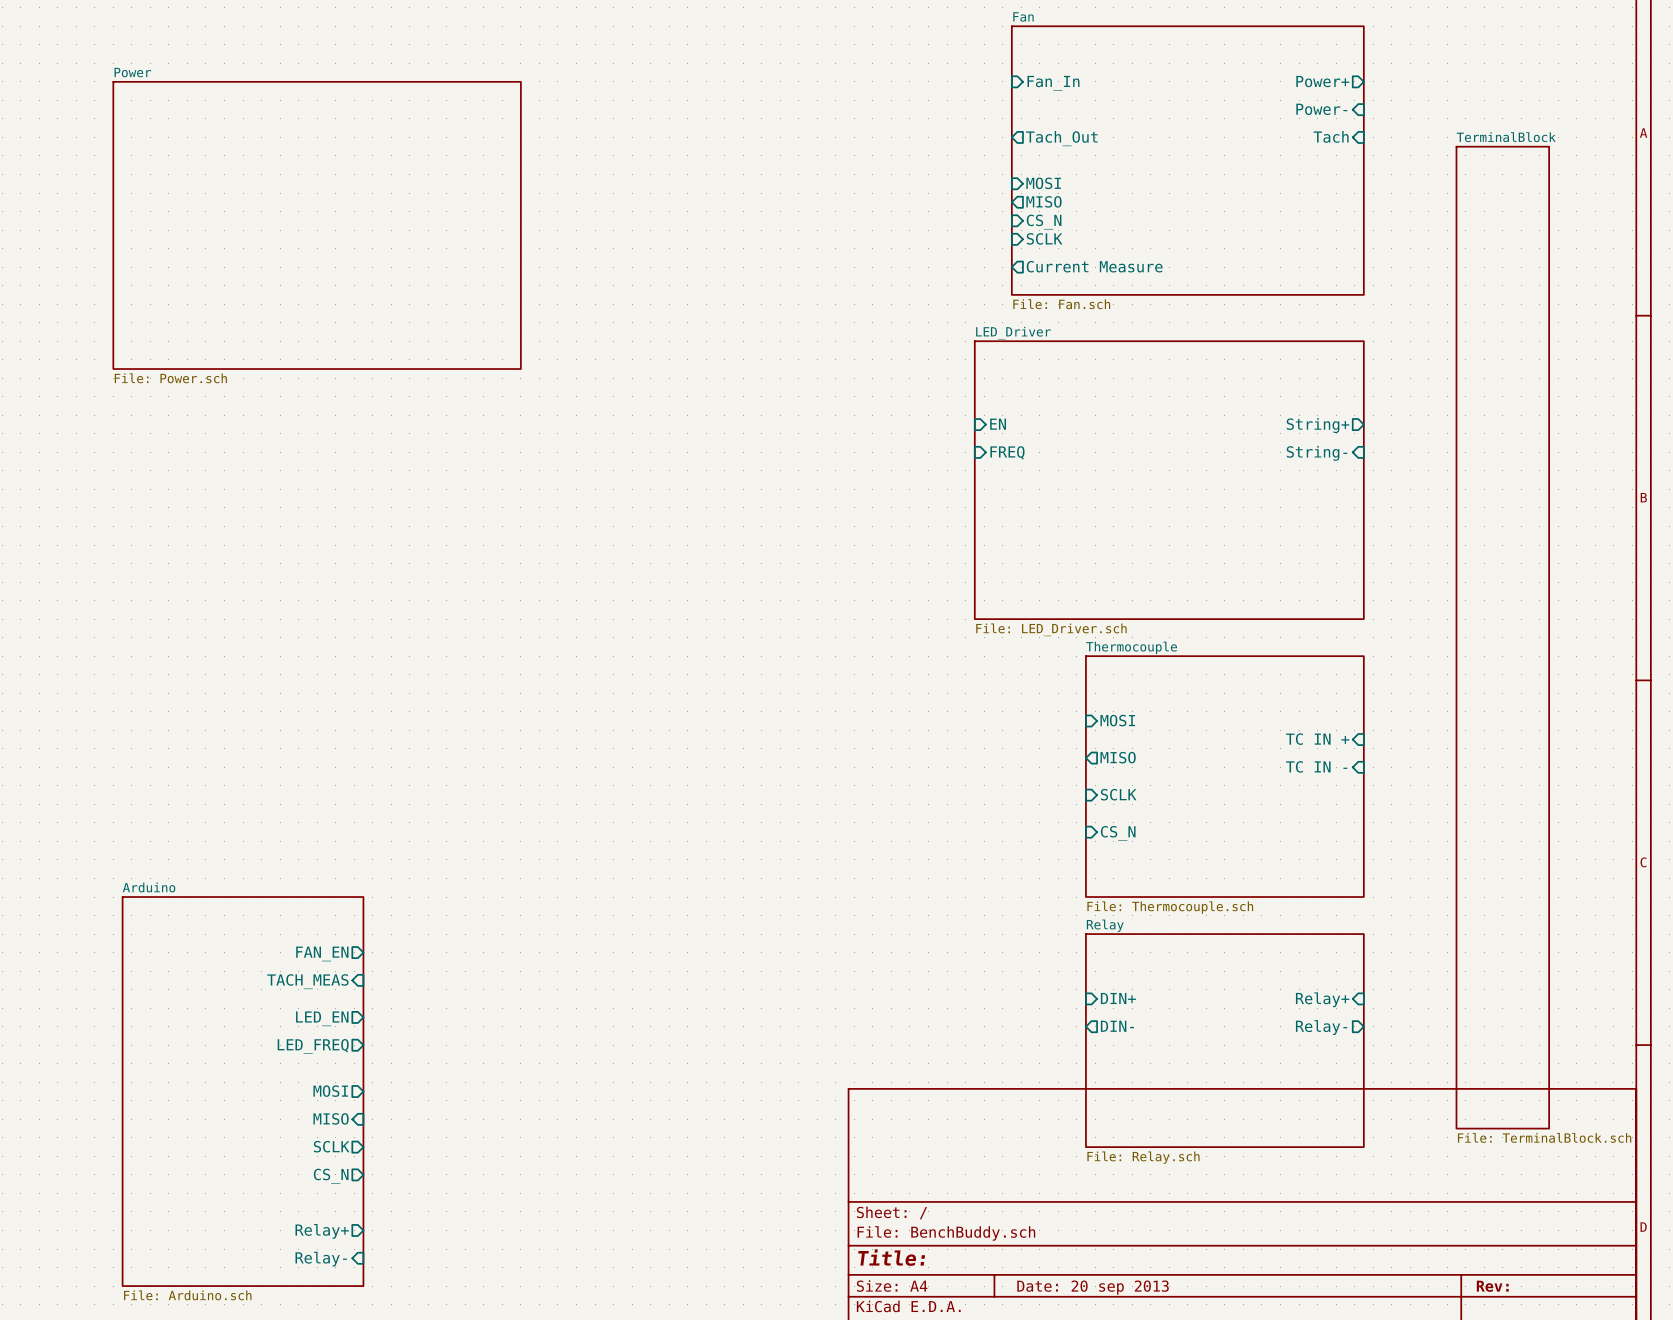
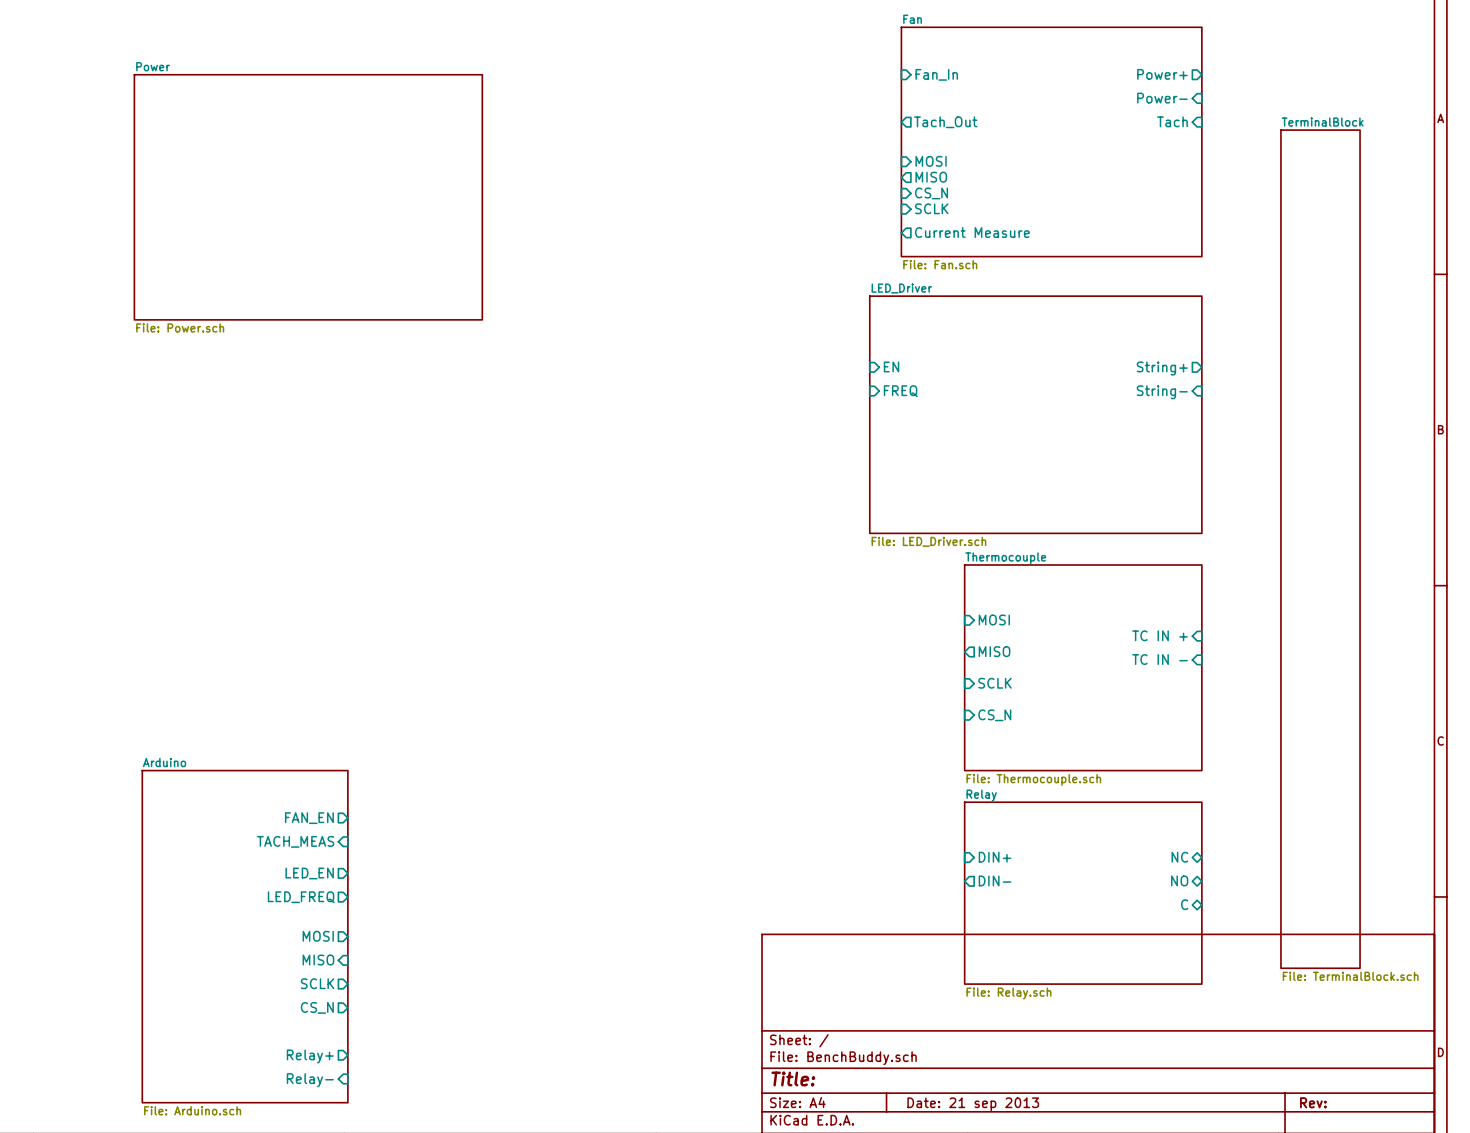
sheet pin shape: input (1322, 999) -> bidirectional (1179, 857)
sheet pin: Relay+ (1322, 999) -> NC (1179, 857)
sheet pin shape: output (1321, 1027) -> bidirectional (1179, 880)
sheet pin: Relay- (1321, 1027) -> NO (1179, 880)
sheet pin: none -> C (1184, 904)
title block: Date: 20 sep 2013 (1093, 1287) -> Date: 21 sep 2013 (973, 1104)

